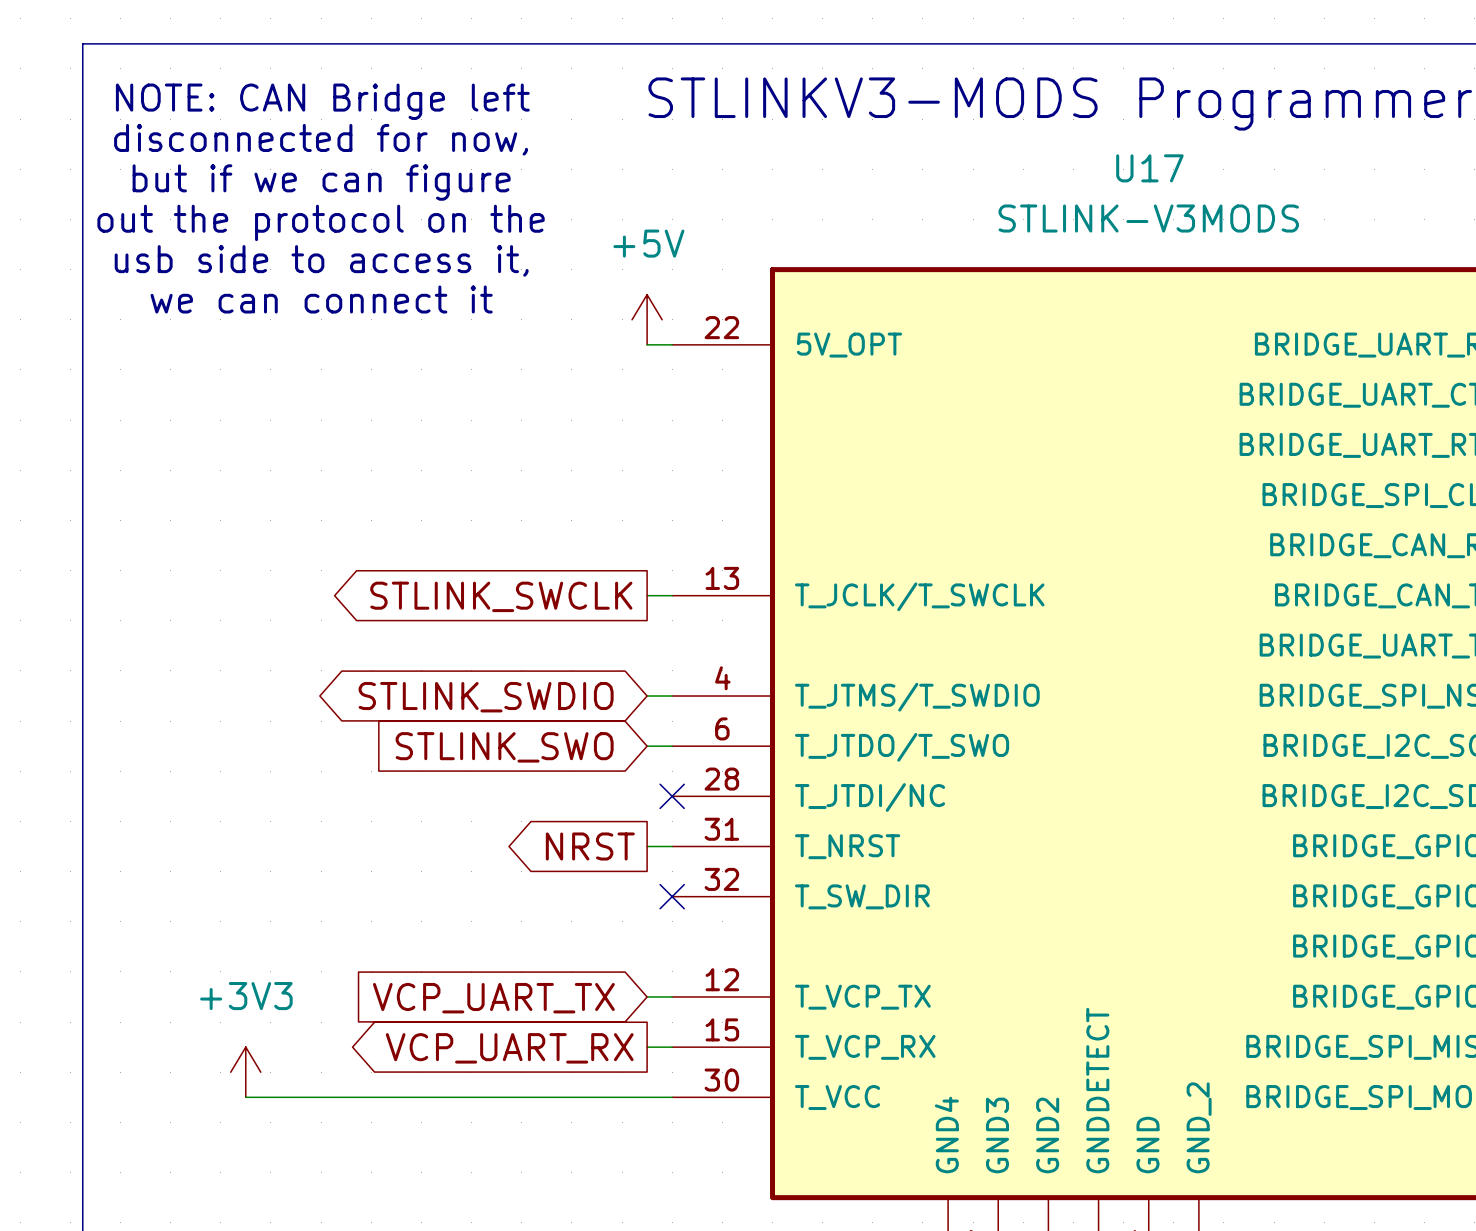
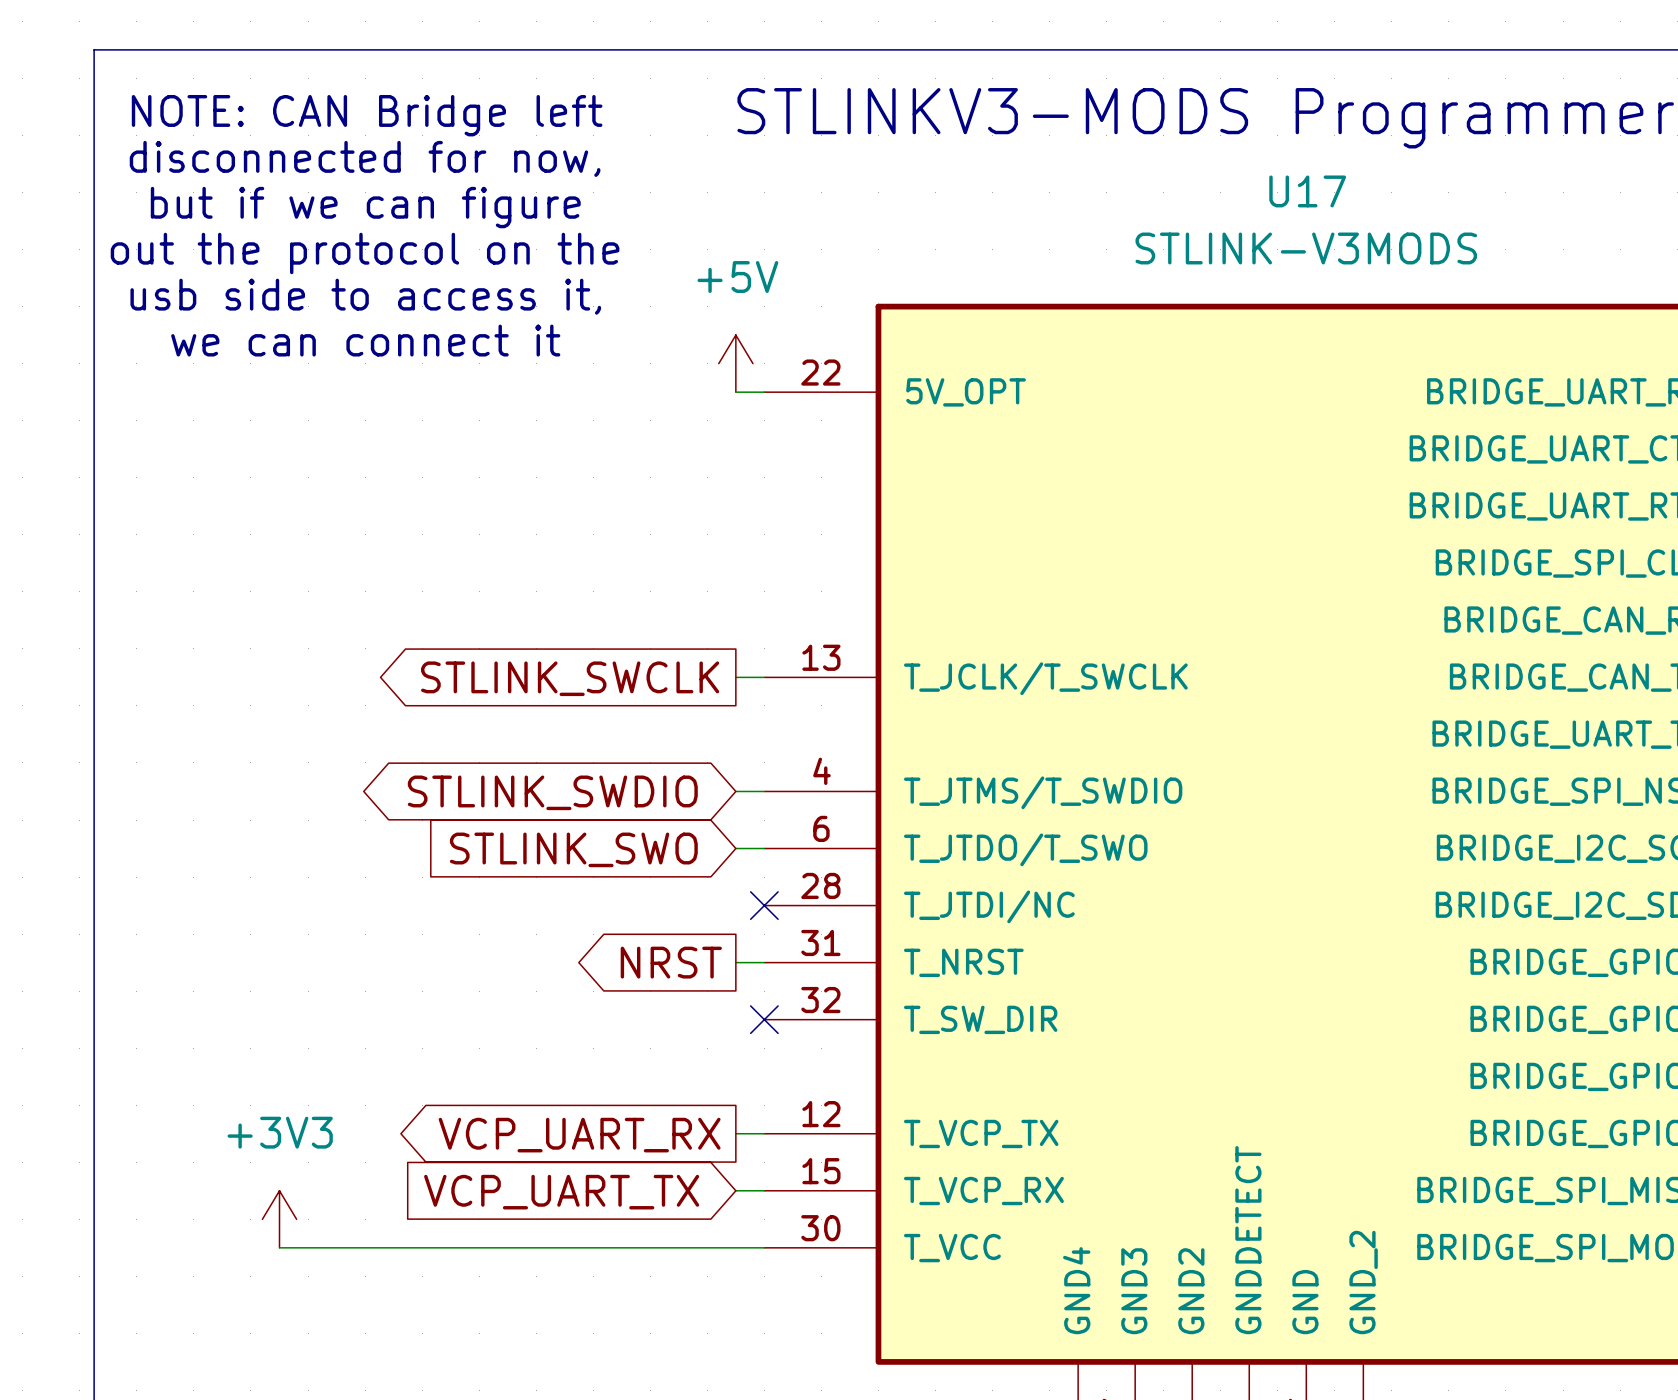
global label shape: input (493, 998) -> output (579, 1135)
global label: VCP_UART_TX (493, 998) -> VCP_UART_RX (579, 1135)
global label shape: output (509, 1048) -> input (561, 1192)
global label: VCP_UART_RX (509, 1048) -> VCP_UART_TX (561, 1192)

